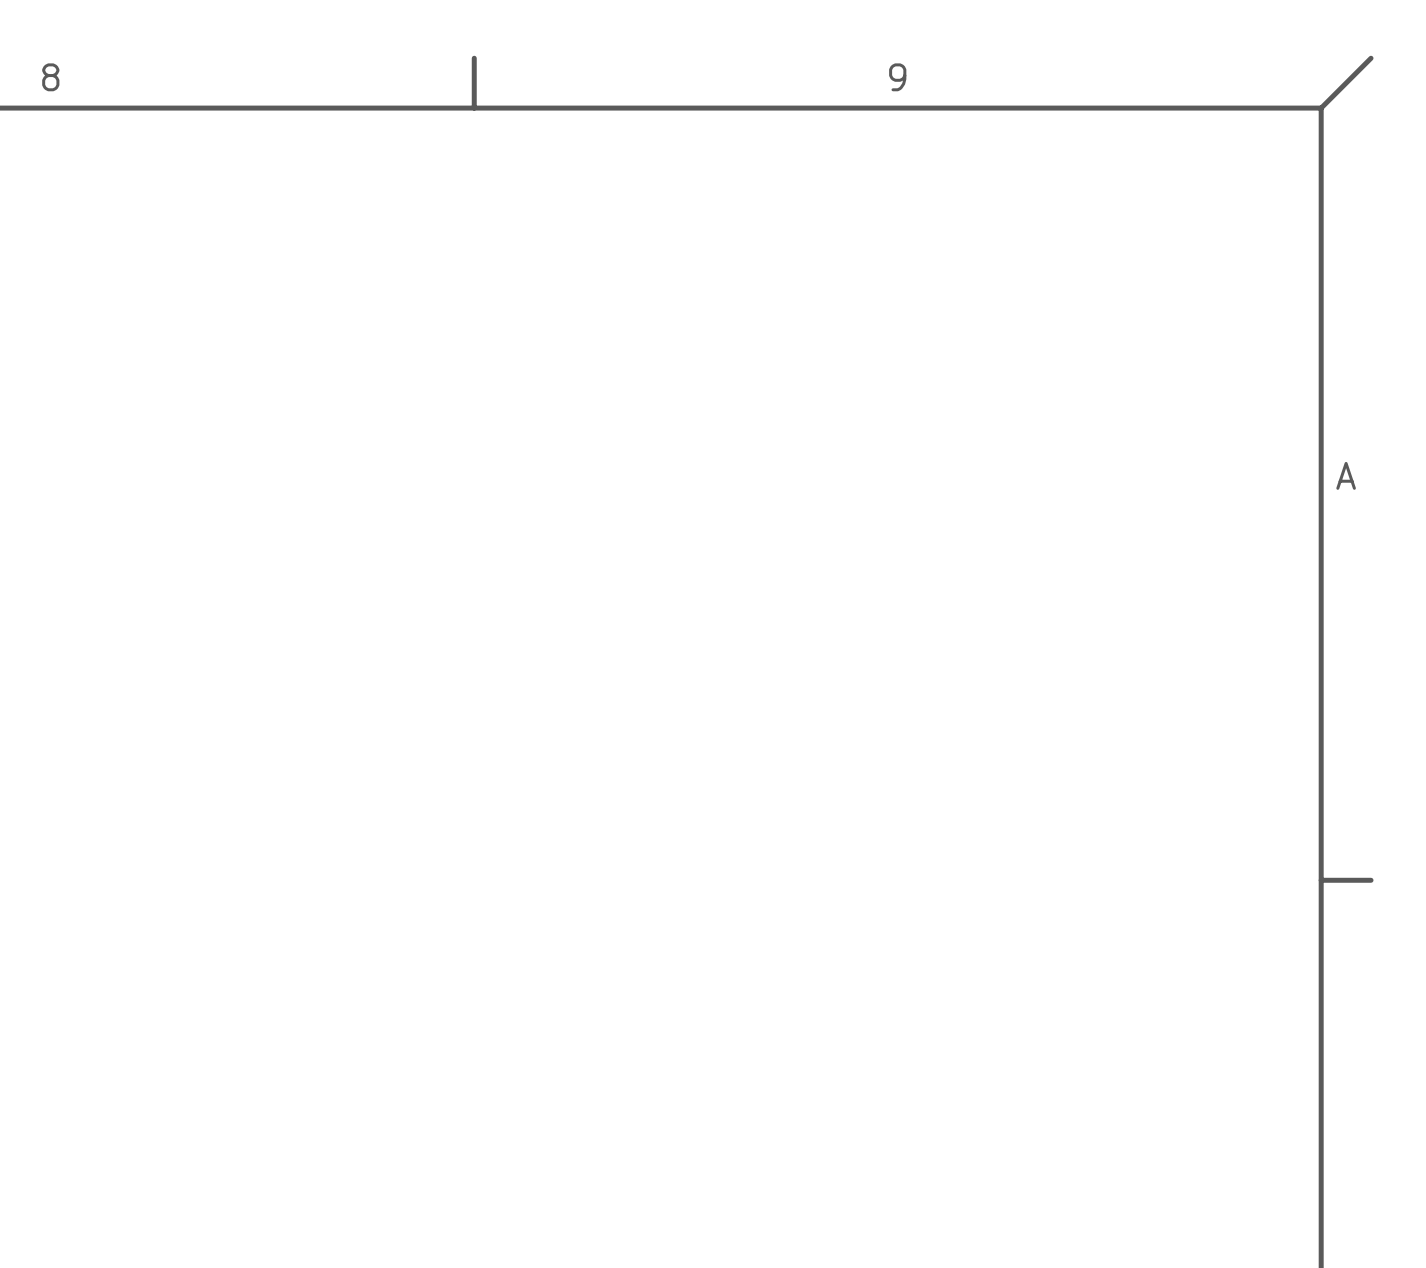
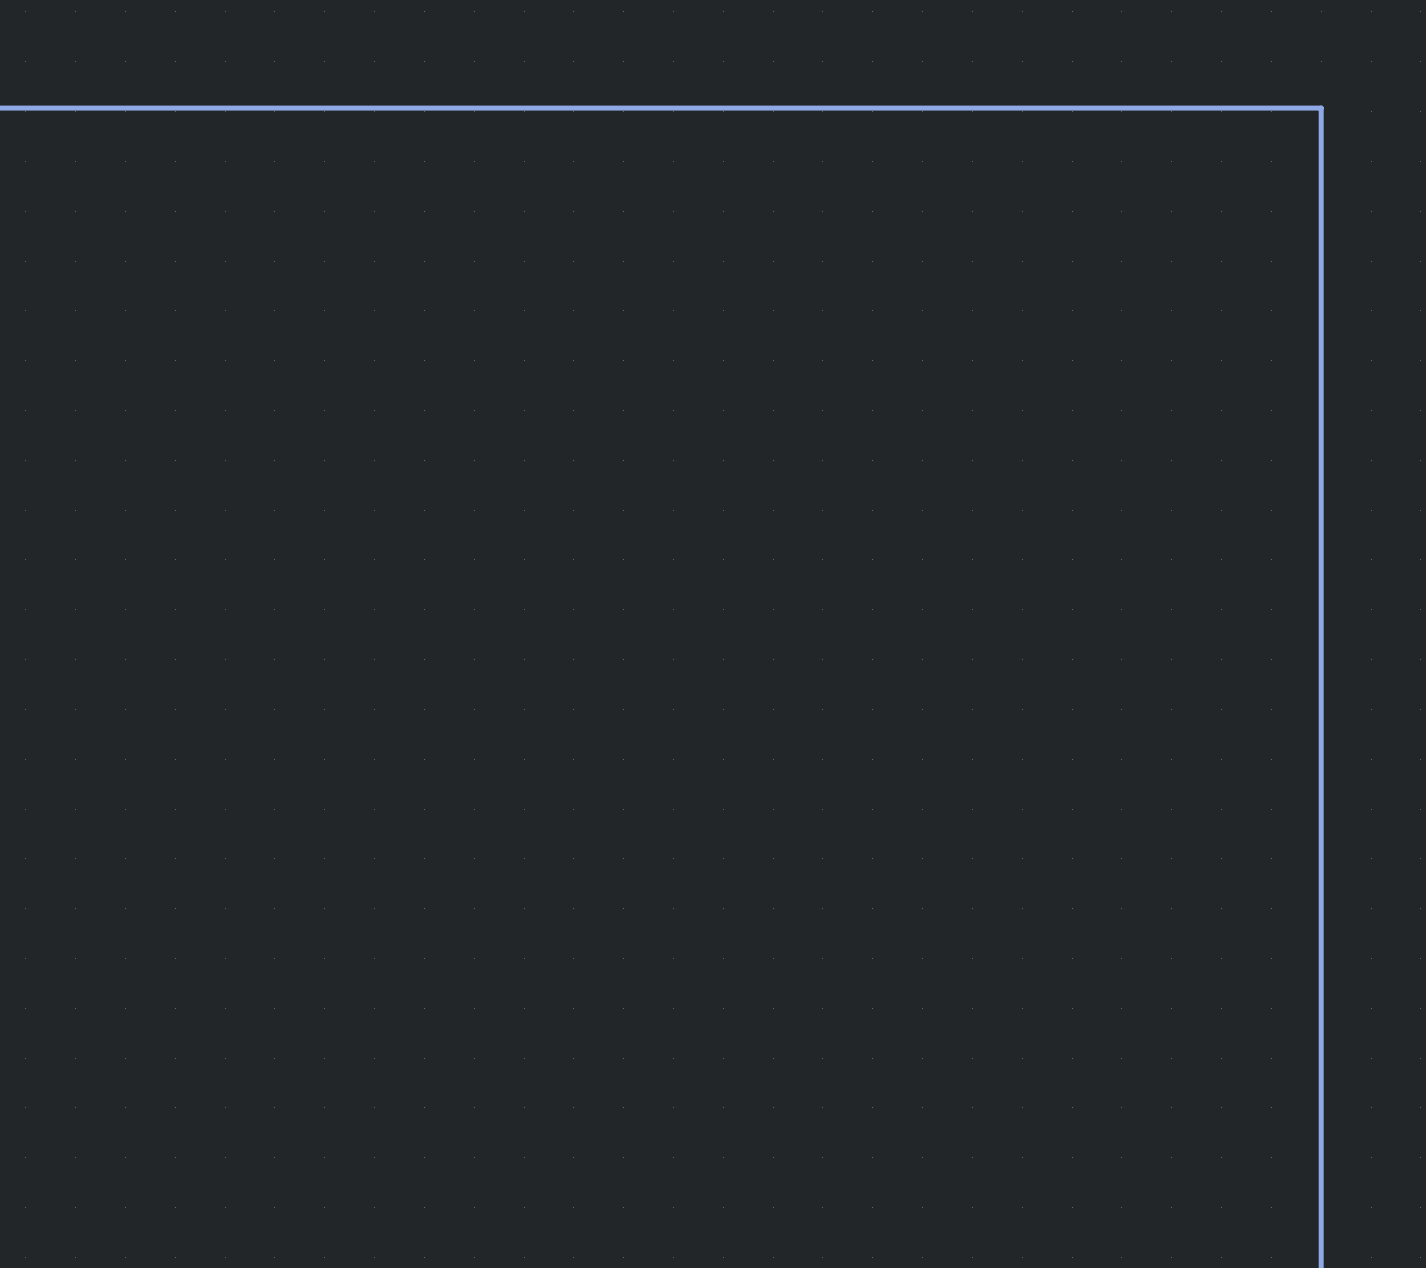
line: (474, 58) (474, 108) -> none
line: (1371, 58) (1321, 108) -> none
text: 8 (50, 77) -> none
text: 9 (897, 77) -> none
text: A (1346, 475) -> none
line: (1321, 880) (1371, 880) -> none

